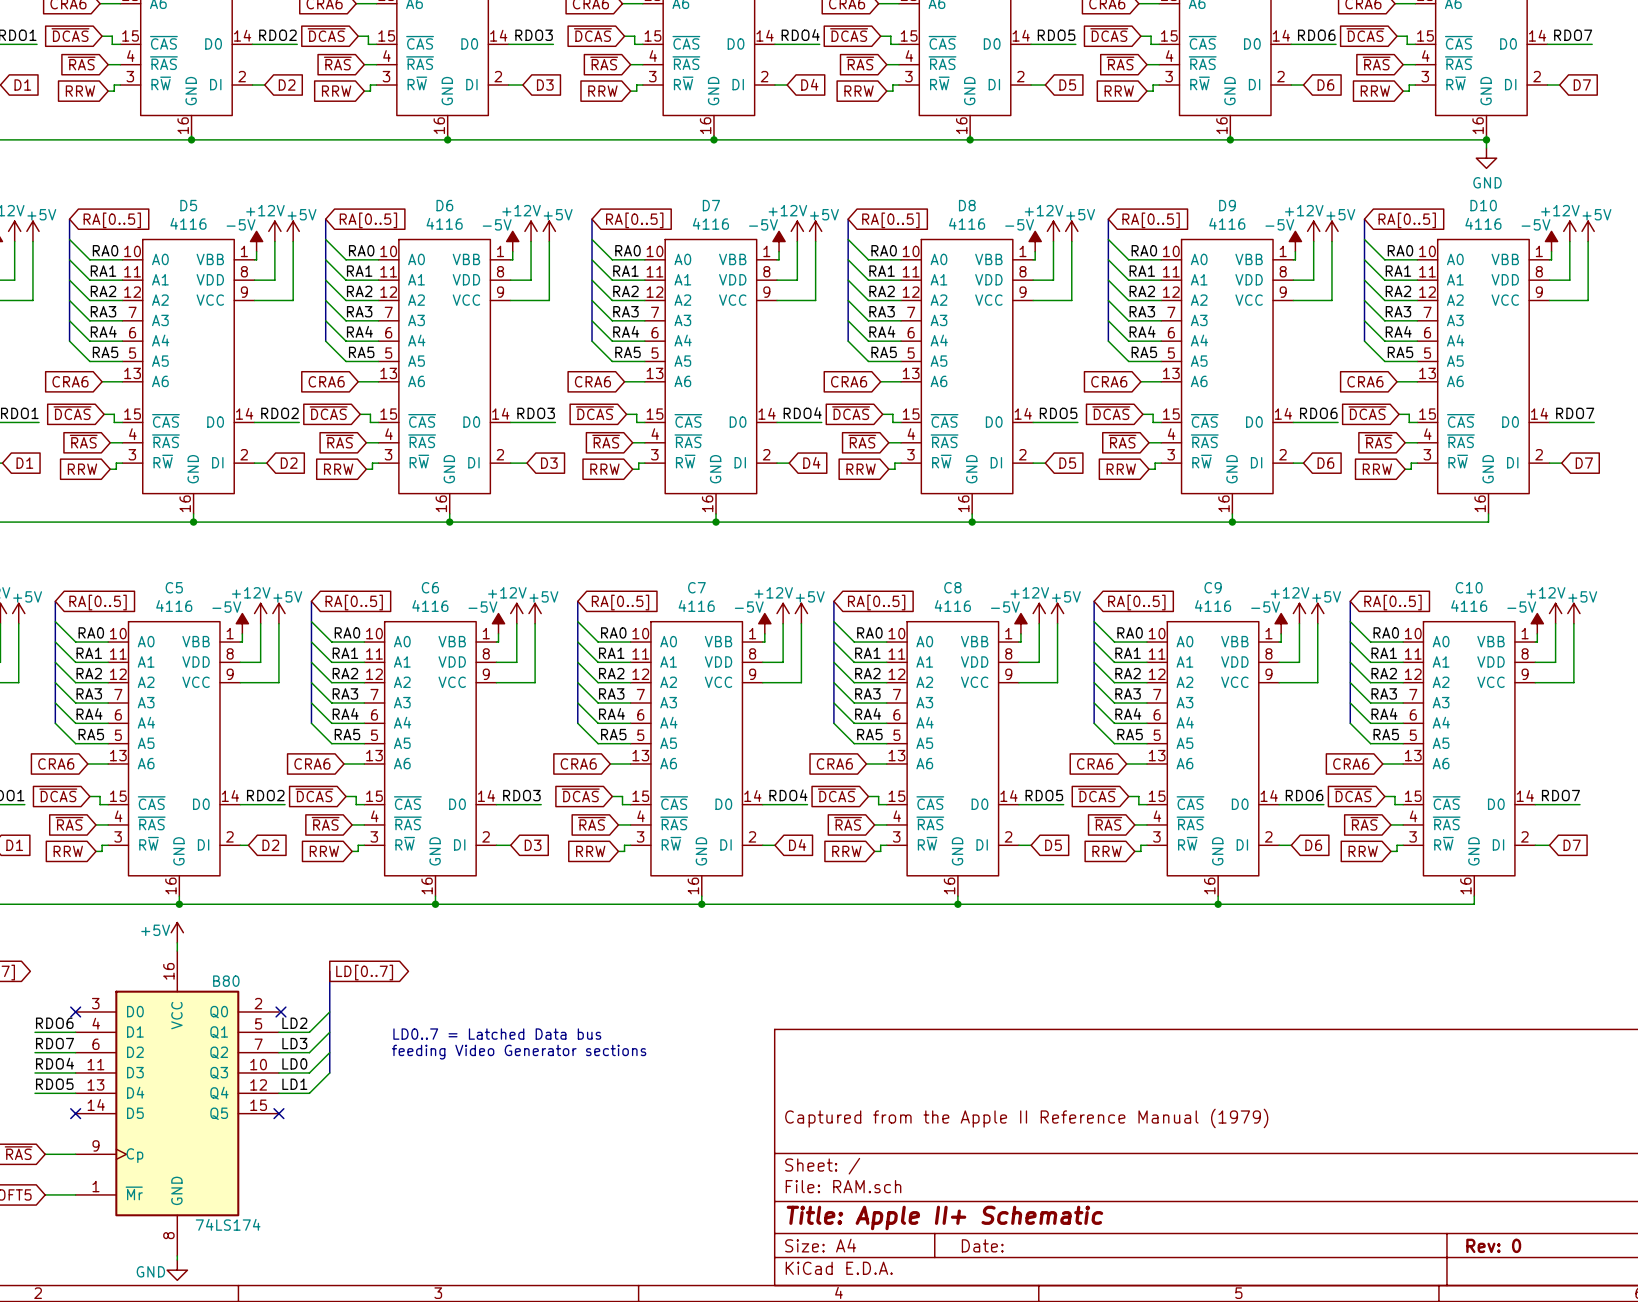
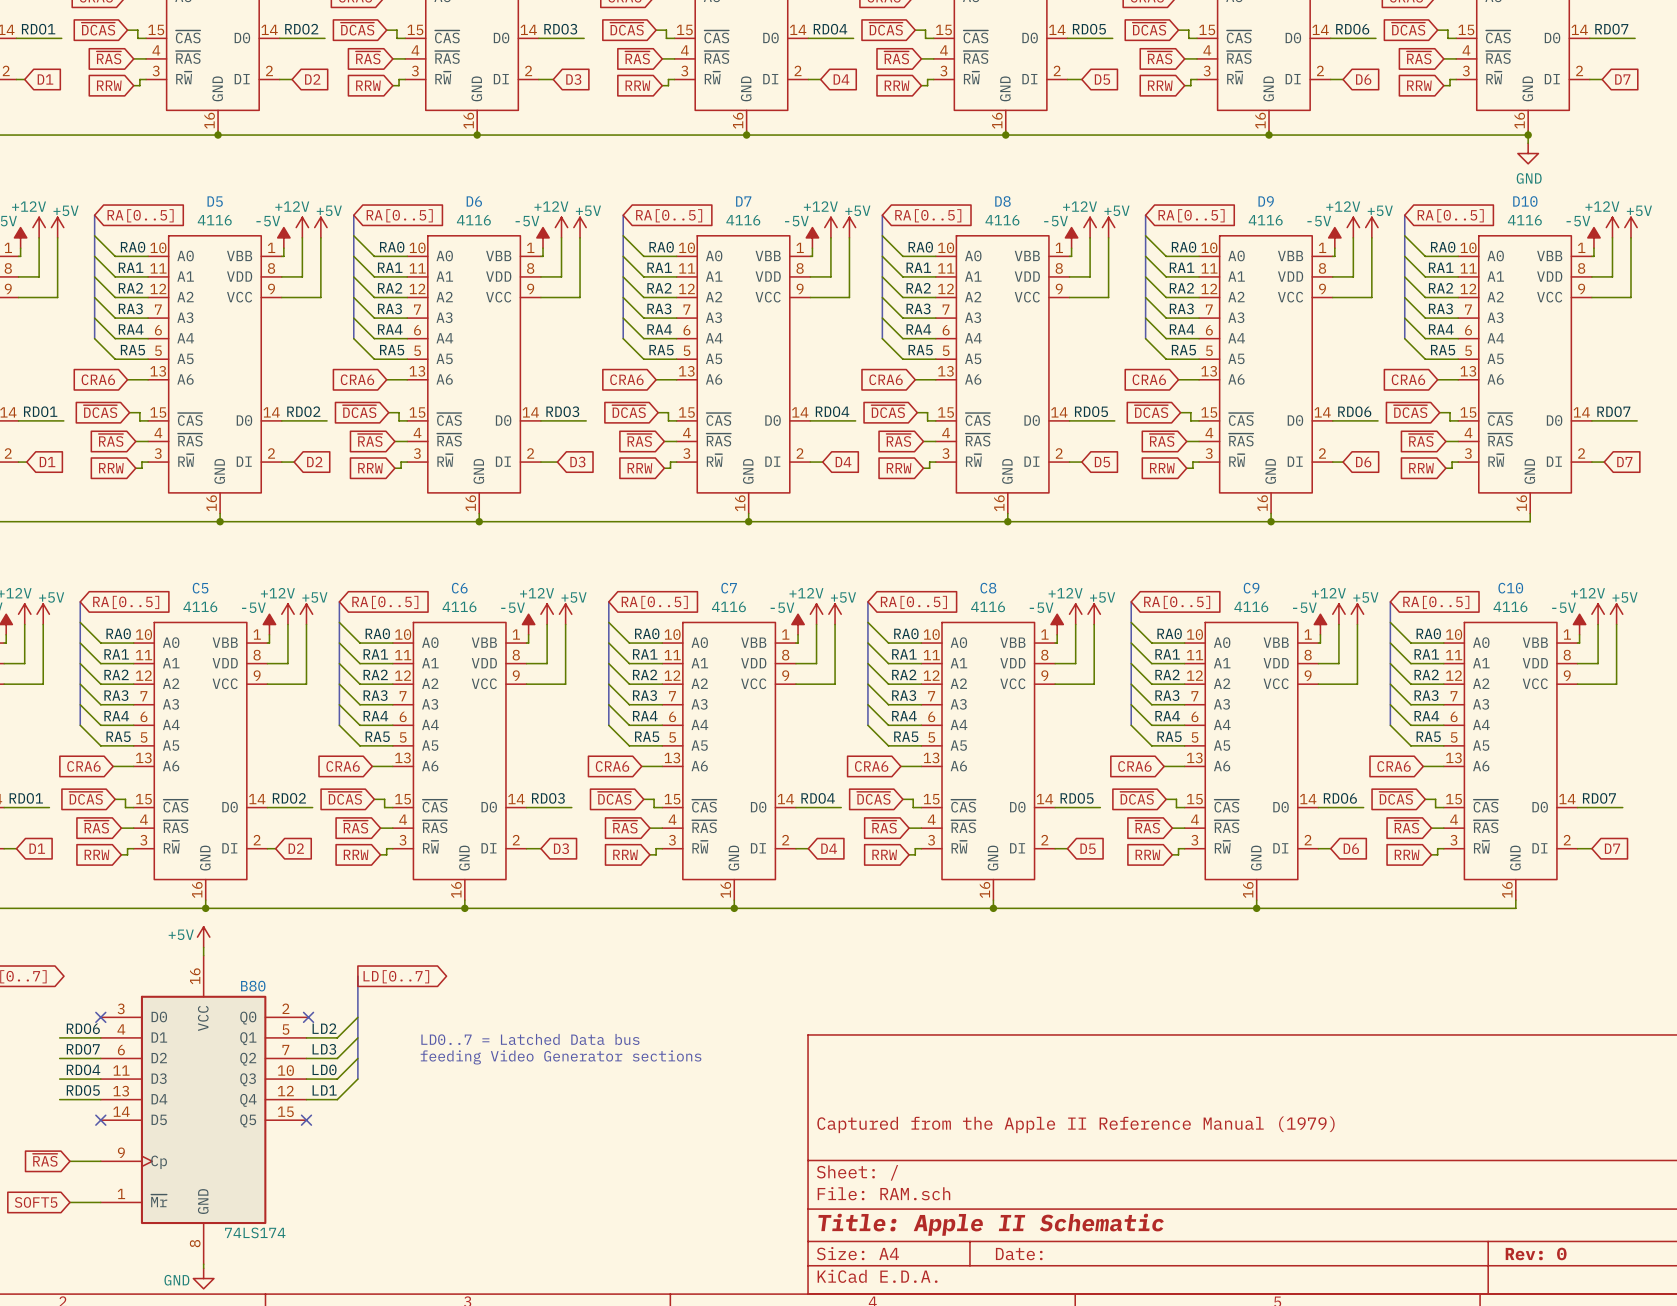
title block: Title: Apple II+ Schematic (944, 1217) -> Title: Apple II Schematic (991, 1224)

